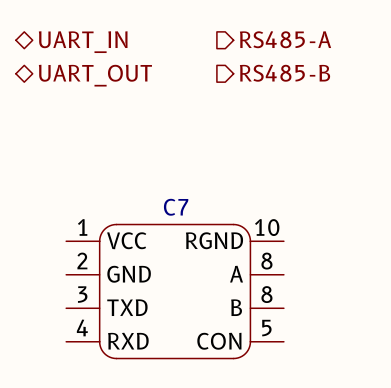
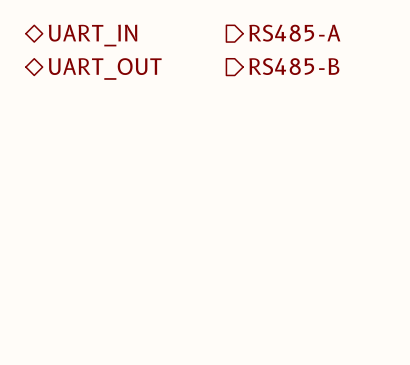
C7: (175, 291) -> none

